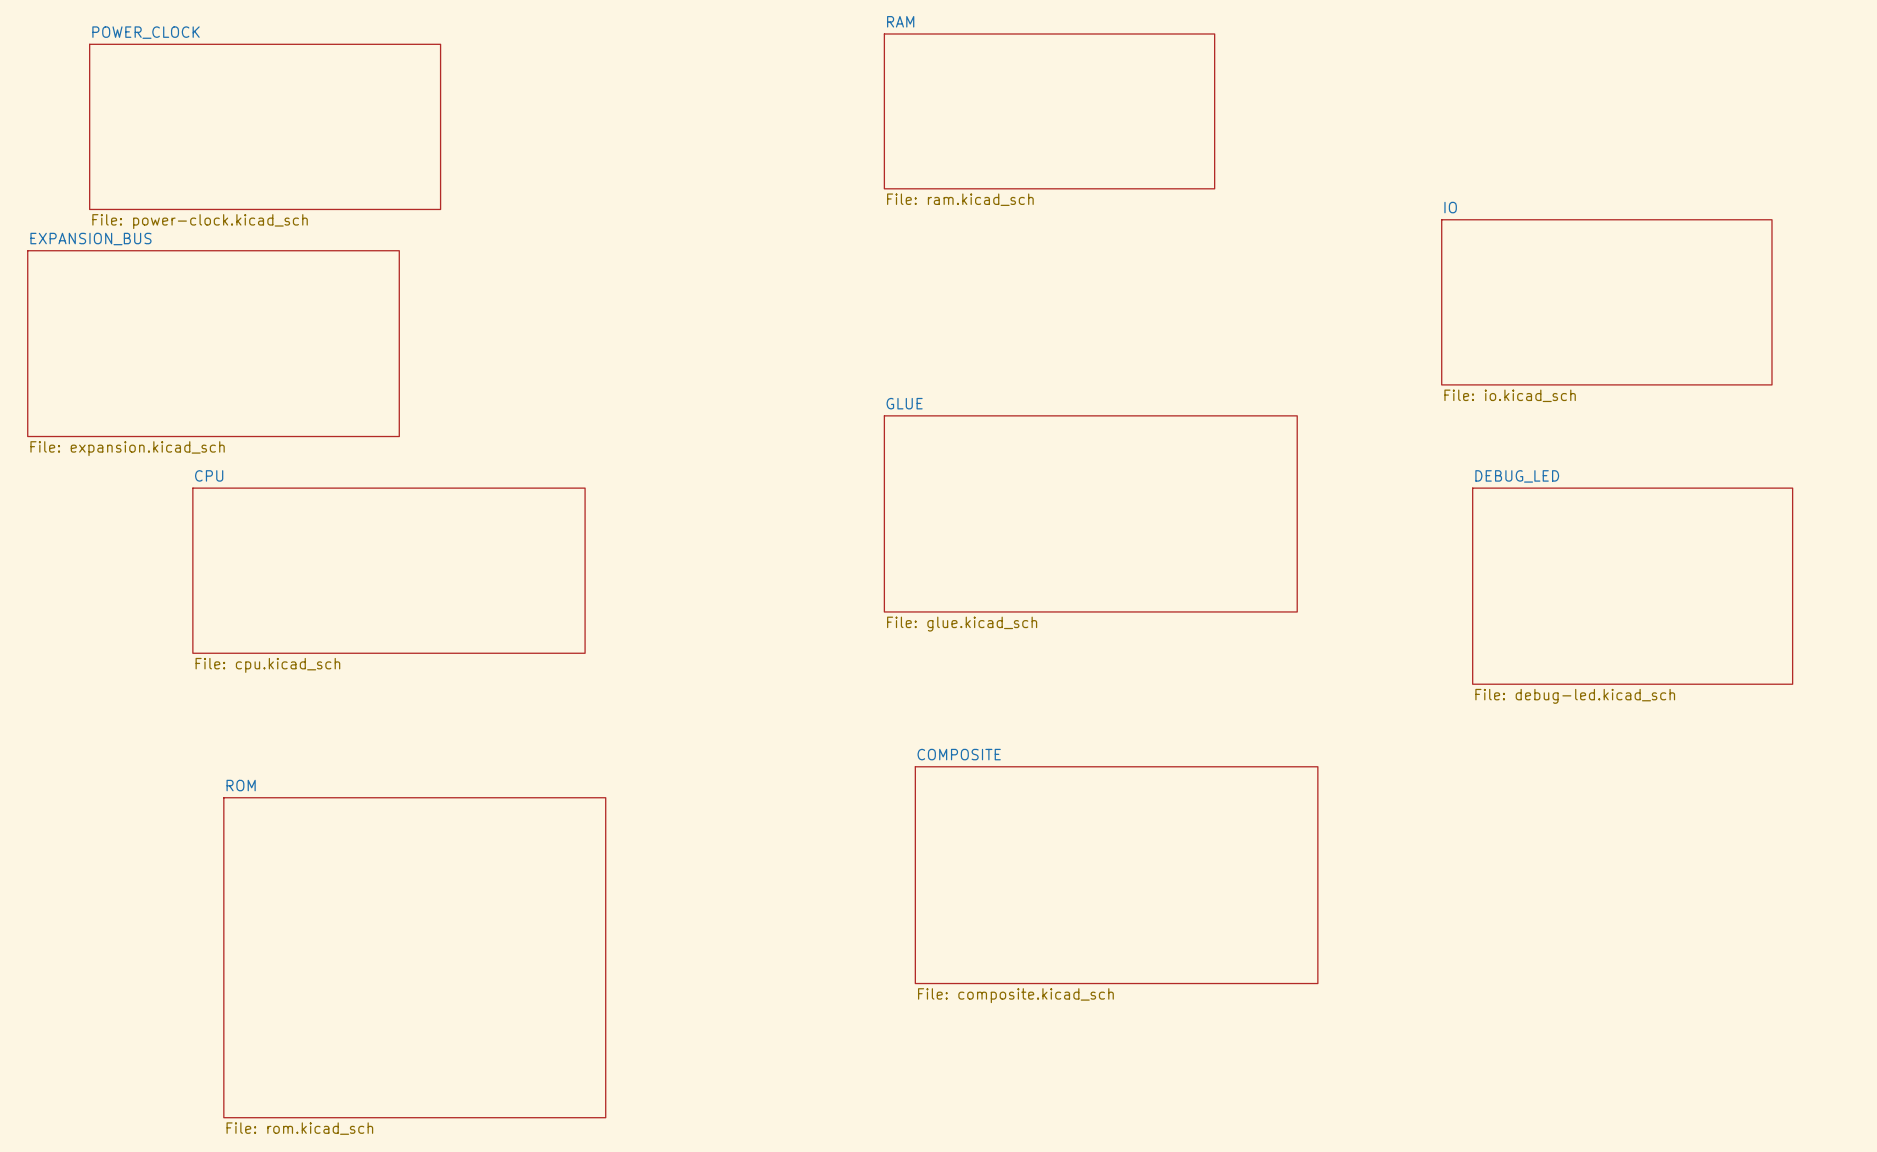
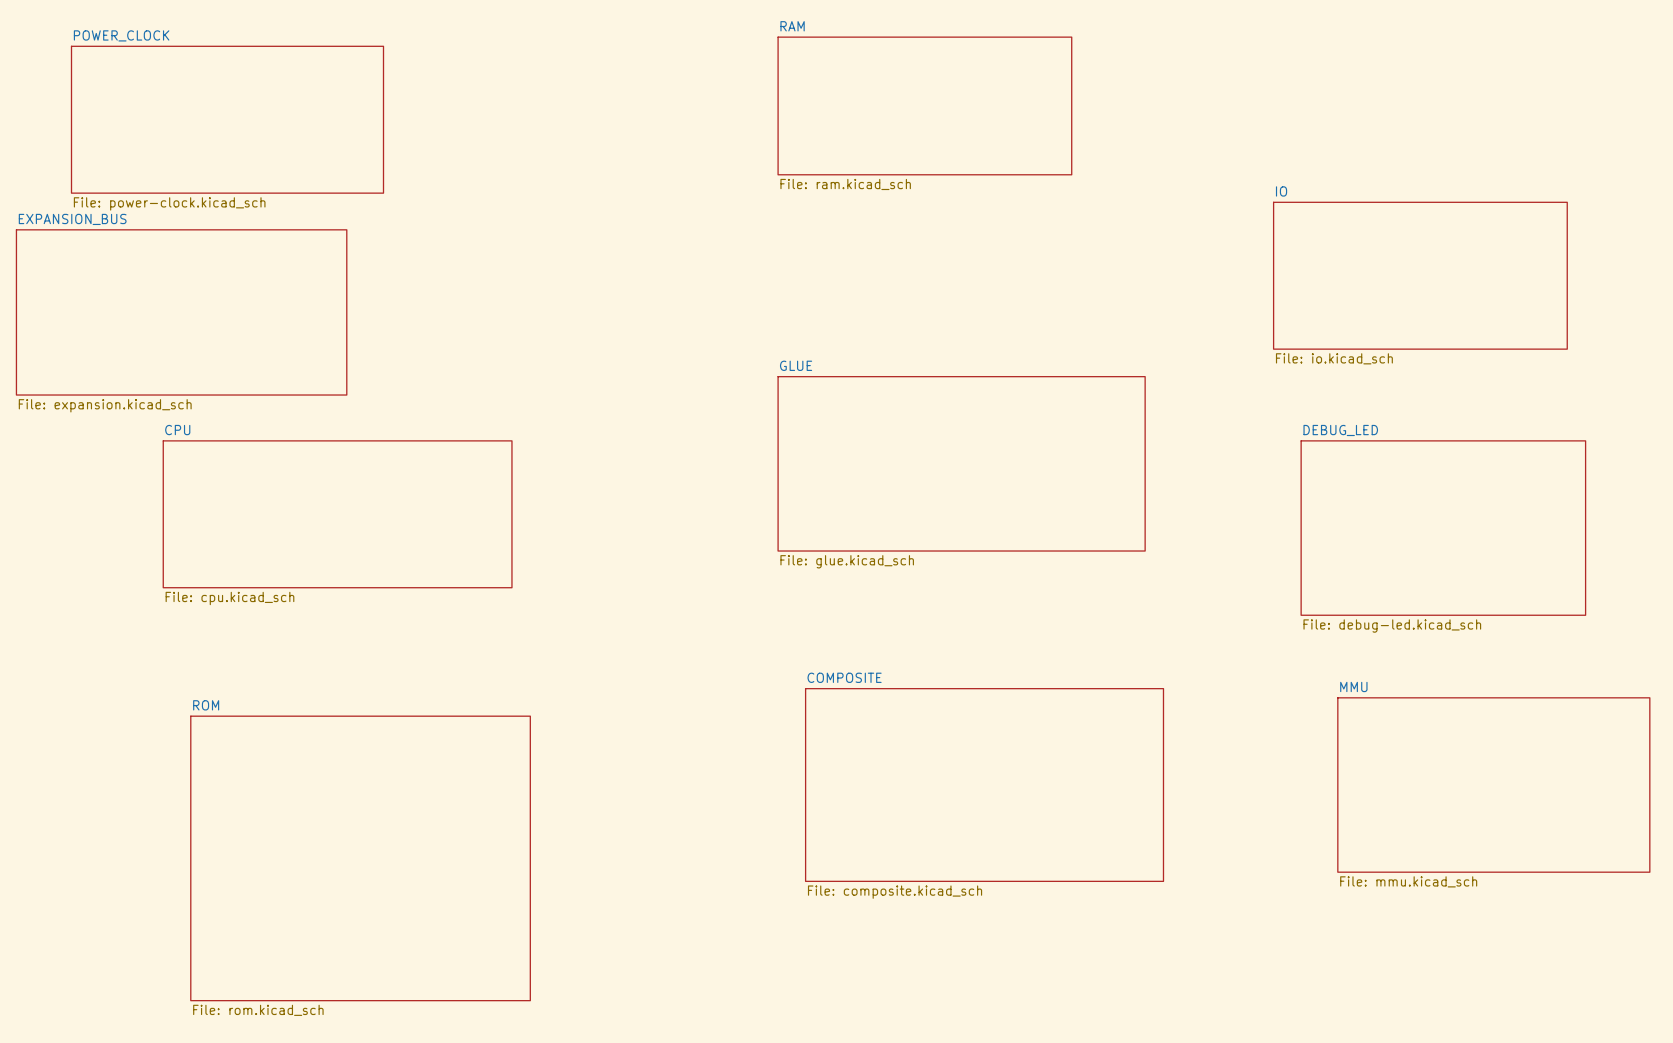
sheet MMU: none -> File: mmu.kicad_sch (1493, 785)

